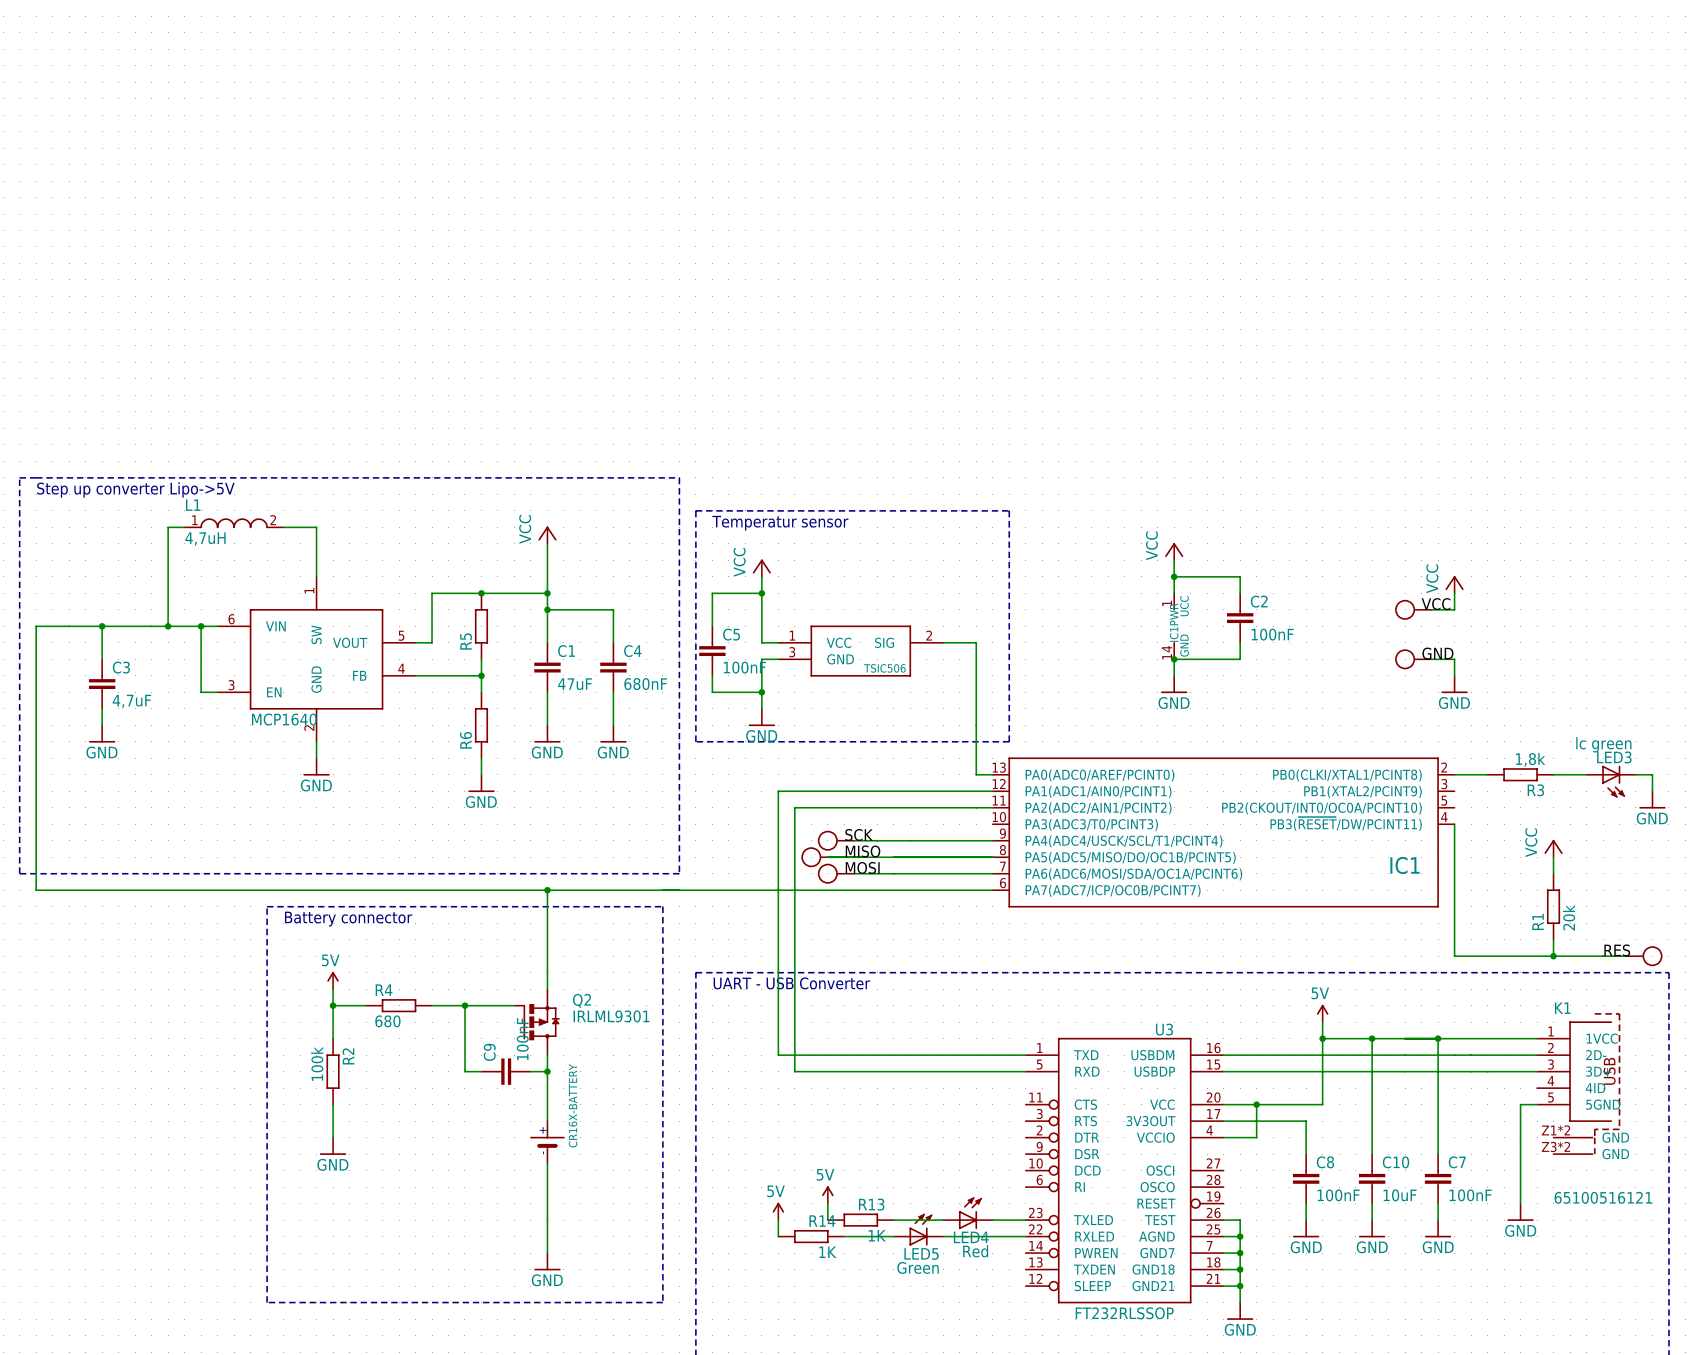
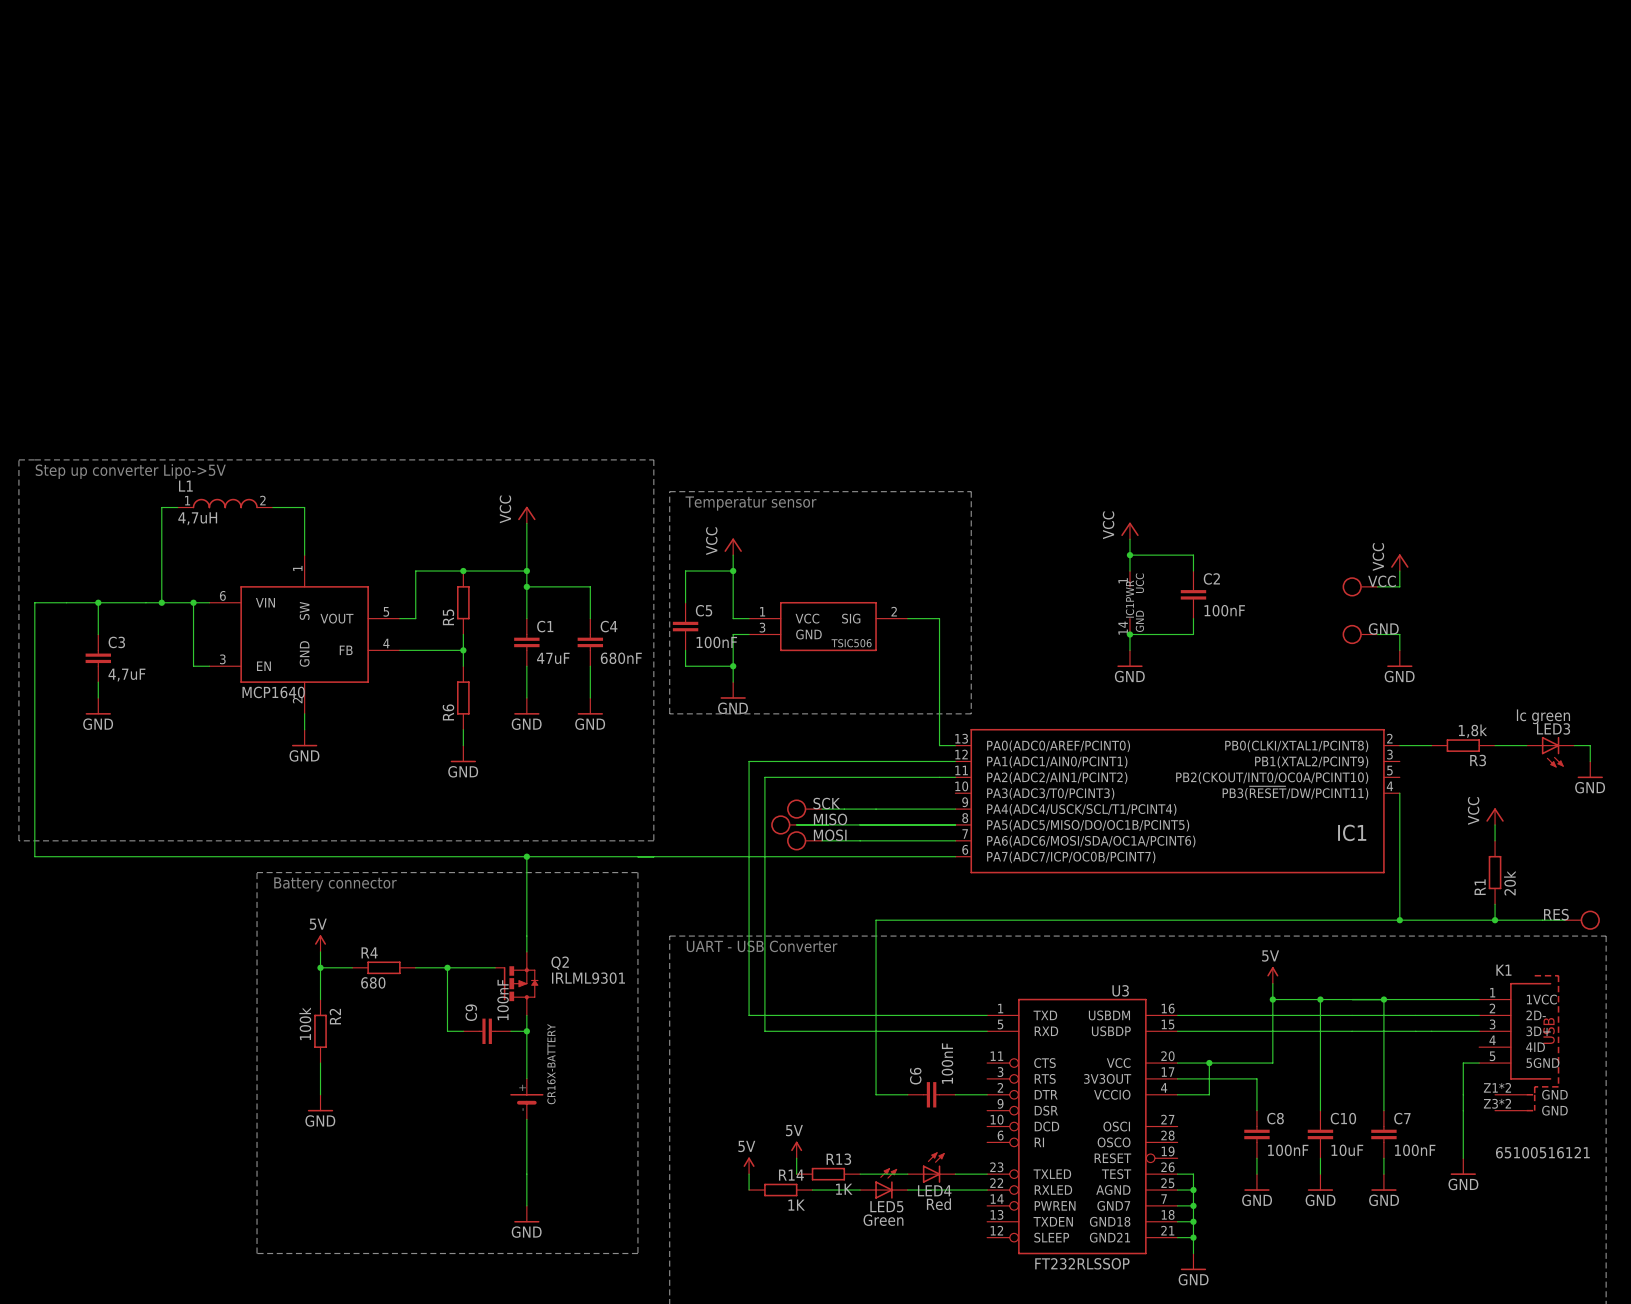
wire: none -> (1399, 920) (876, 920) (876, 1094) (907, 1094)
junction: none -> (1399, 920)
C6: none -> 100nF (931, 1094)
wire: none -> (955, 1094) (987, 1094)

